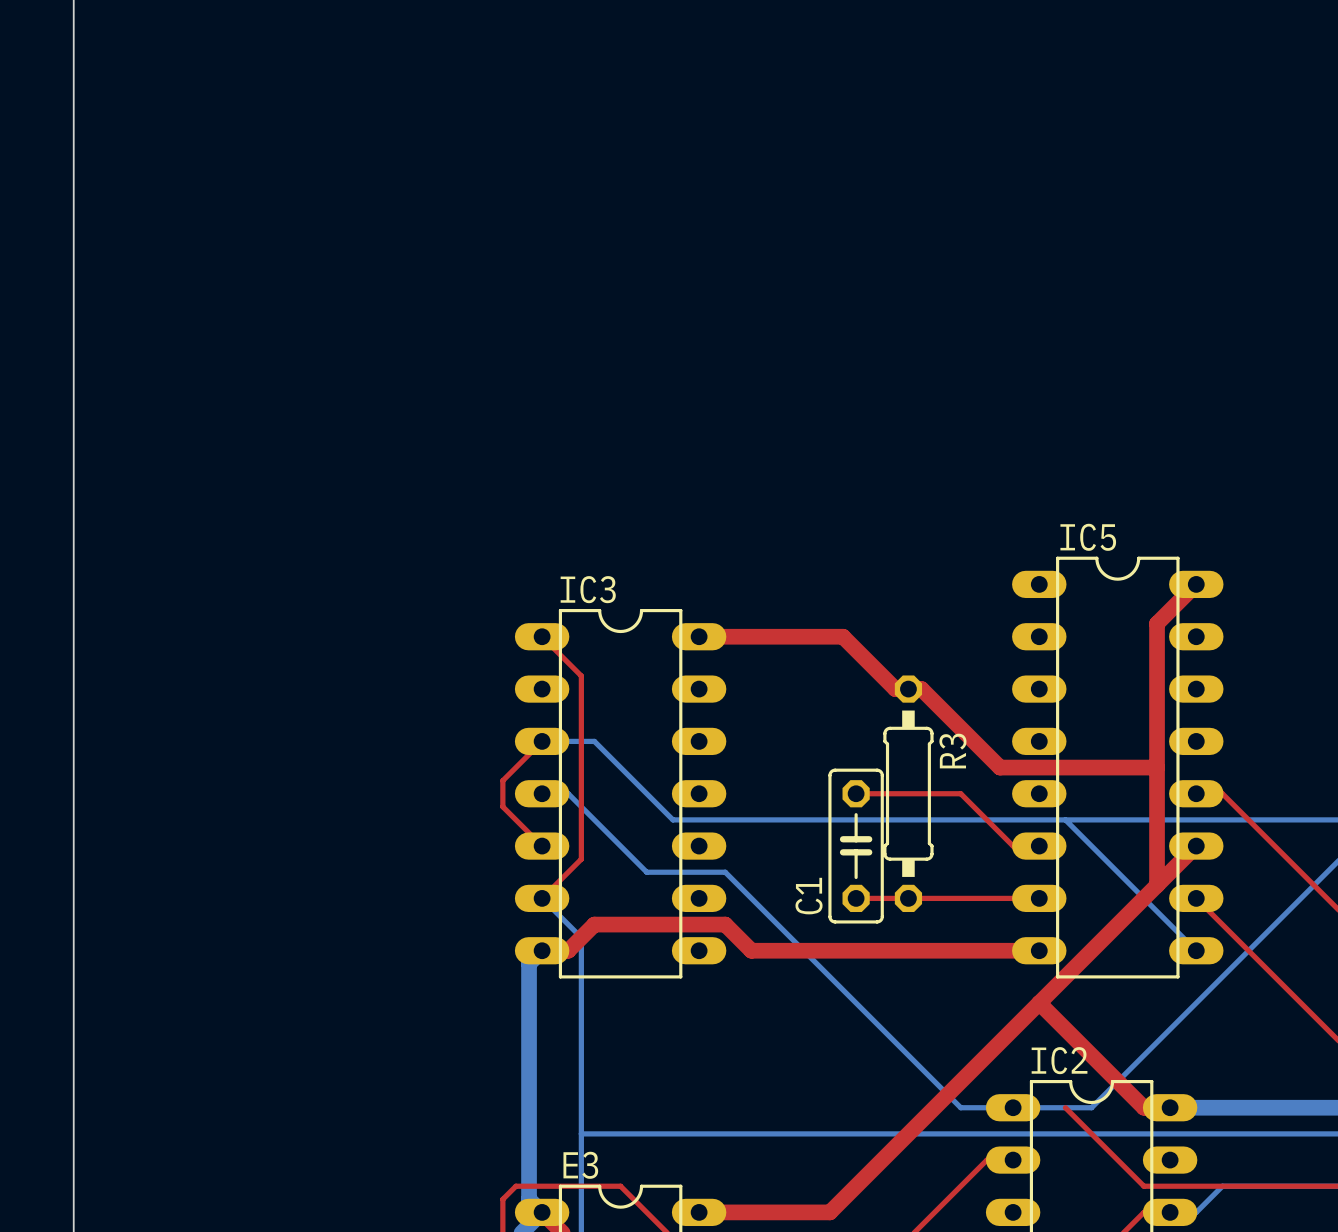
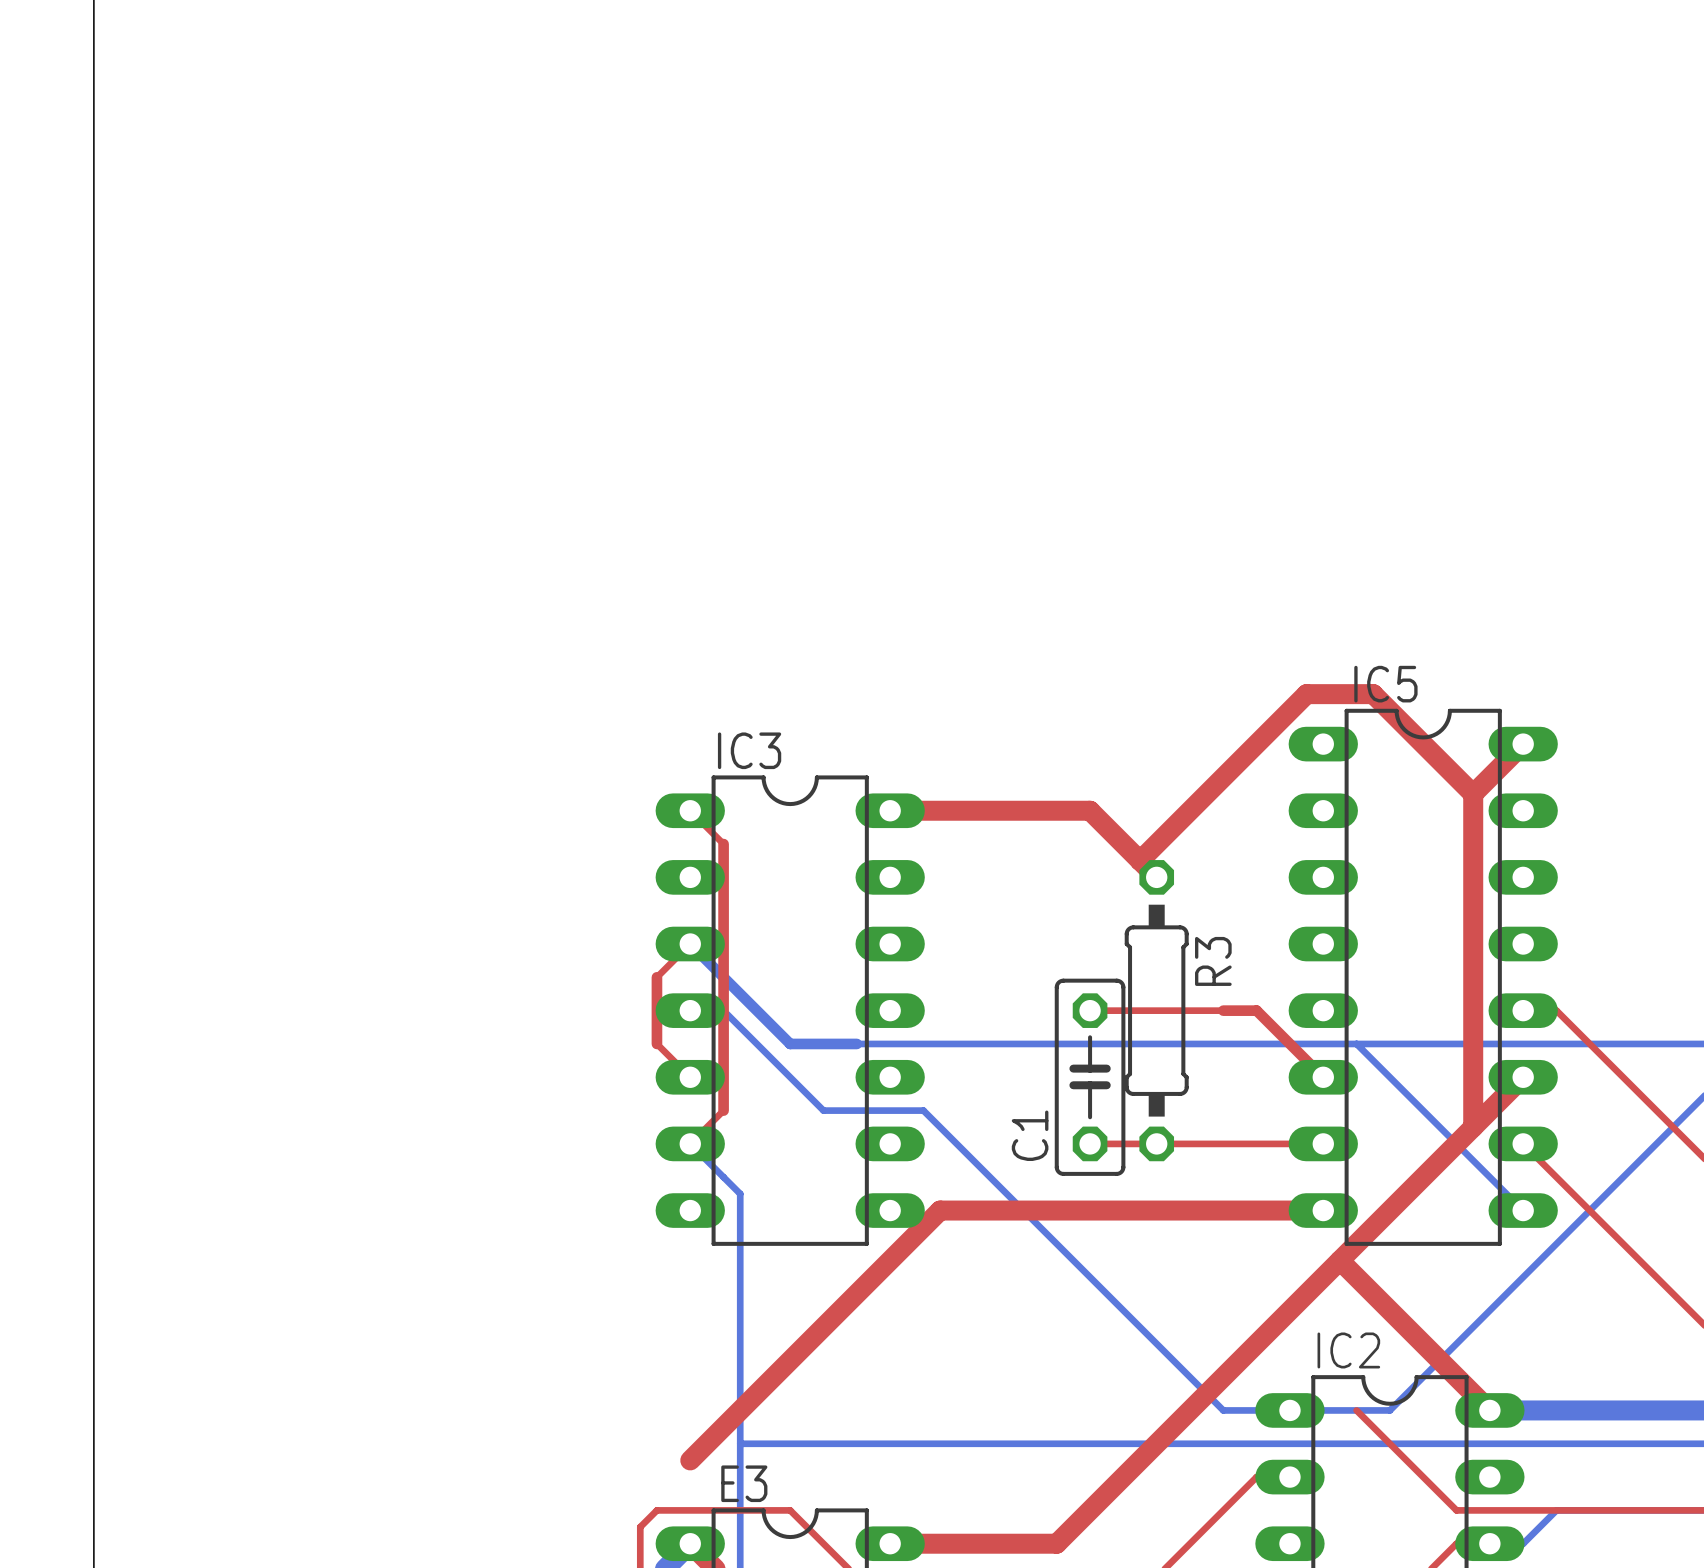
top track: none -> (1473, 794) (1373, 694) (1306, 694) (1140, 860)
top track: (843, 636) (895, 689) (921, 689) (1000, 767) (1157, 767) -> (1073, 810) (1090, 810) (1156, 877)
top track: (568, 662) (581, 675) (581, 859) (568, 872) -> (723, 844) (723, 1110)
bottom track: (542, 741) (594, 741) (672, 819) -> (690, 944) (790, 1043) (856, 1043)
top track: (515, 767) (502, 780) (502, 806) (515, 819) -> (656, 977) (656, 1043)
top track: (960, 793) (1013, 846) (1039, 846) -> (1223, 1010) (1256, 1010) (1323, 1077)
bottom track: (542, 950) (529, 963) (529, 1199) (542, 1212) -> none
top track: (542, 950) (568, 950) (594, 924) (725, 924) (751, 950) -> (690, 1460) (940, 1210) (956, 1210)
top track: (1039, 1003) (1143, 1107) (1170, 1107) -> (1339, 1260) (1489, 1410)

